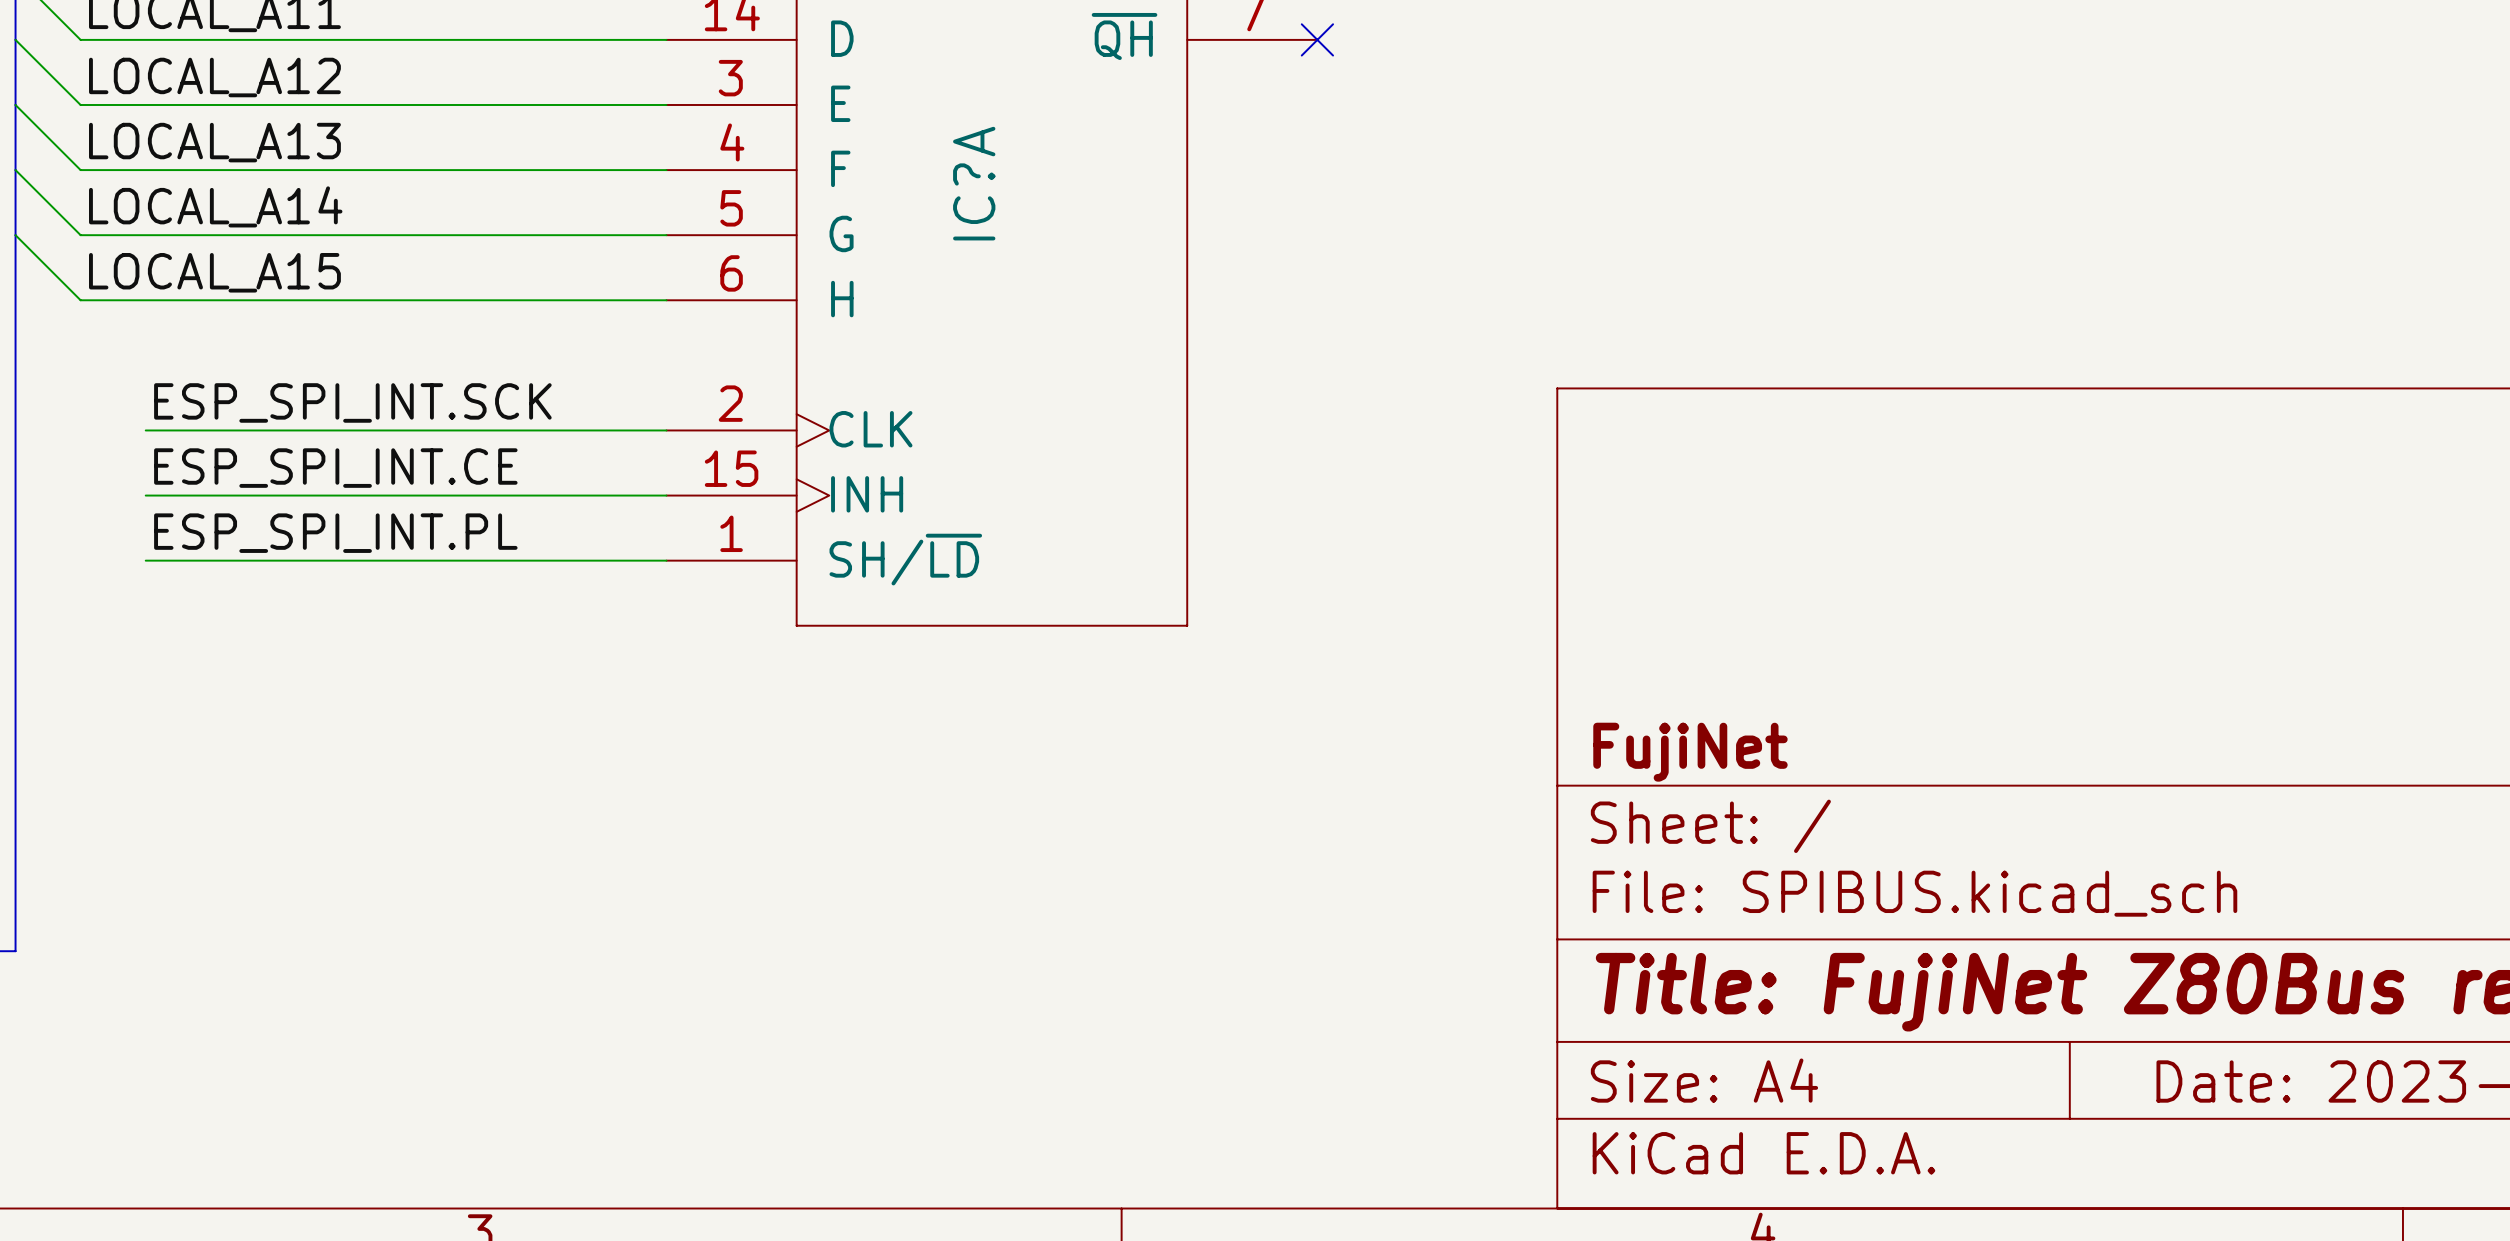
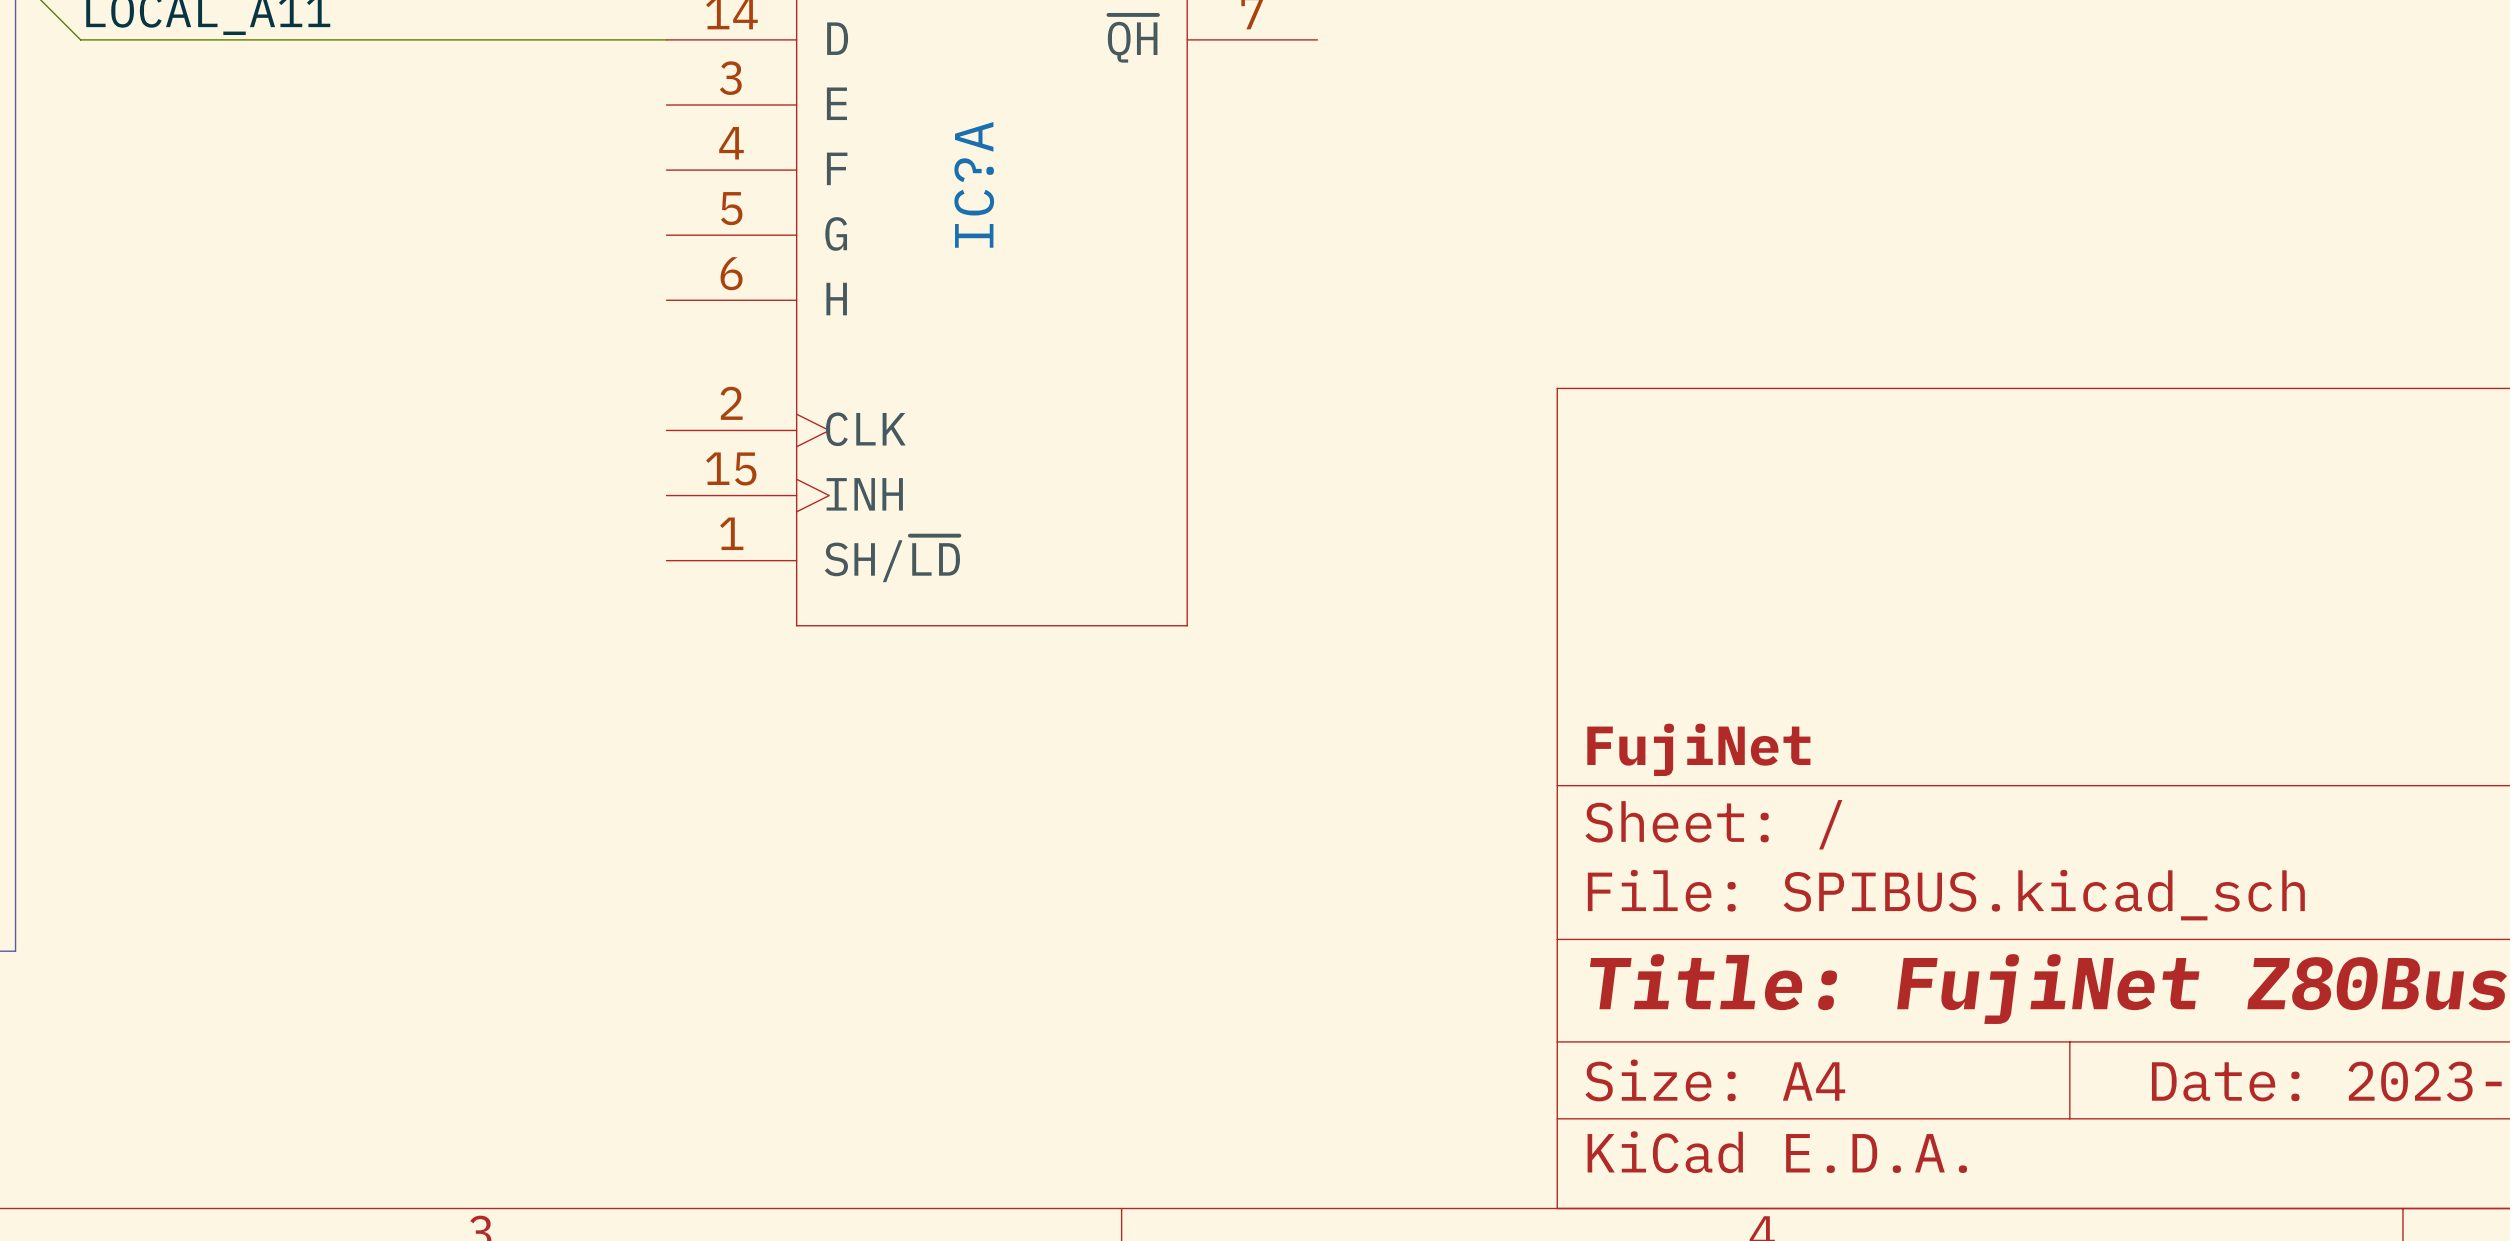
wire: (15, 39) (80, 104) (666, 104) -> none
no-connect mark: (1317, 39) -> none
label: LOCAL_A12 (214, 77) -> none
wire: (15, 104) (80, 170) (666, 170) -> none
label: LOCAL_A13 (214, 142) -> none
wire: (15, 170) (80, 235) (666, 235) -> none
label: LOCAL_A14 (215, 206) -> none
wire: (15, 235) (80, 300) (666, 300) -> none
label: LOCAL_A15 (214, 272) -> none
label: ESP_SPI_INT.SCK (352, 402) -> none
wire: (145, 430) (666, 430) -> none
label: ESP_SPI_INT.CE (335, 468) -> none
wire: (145, 495) (666, 495) -> none
label: ESP_SPI_INT.PL (335, 533) -> none
wire: (145, 560) (666, 560) -> none

